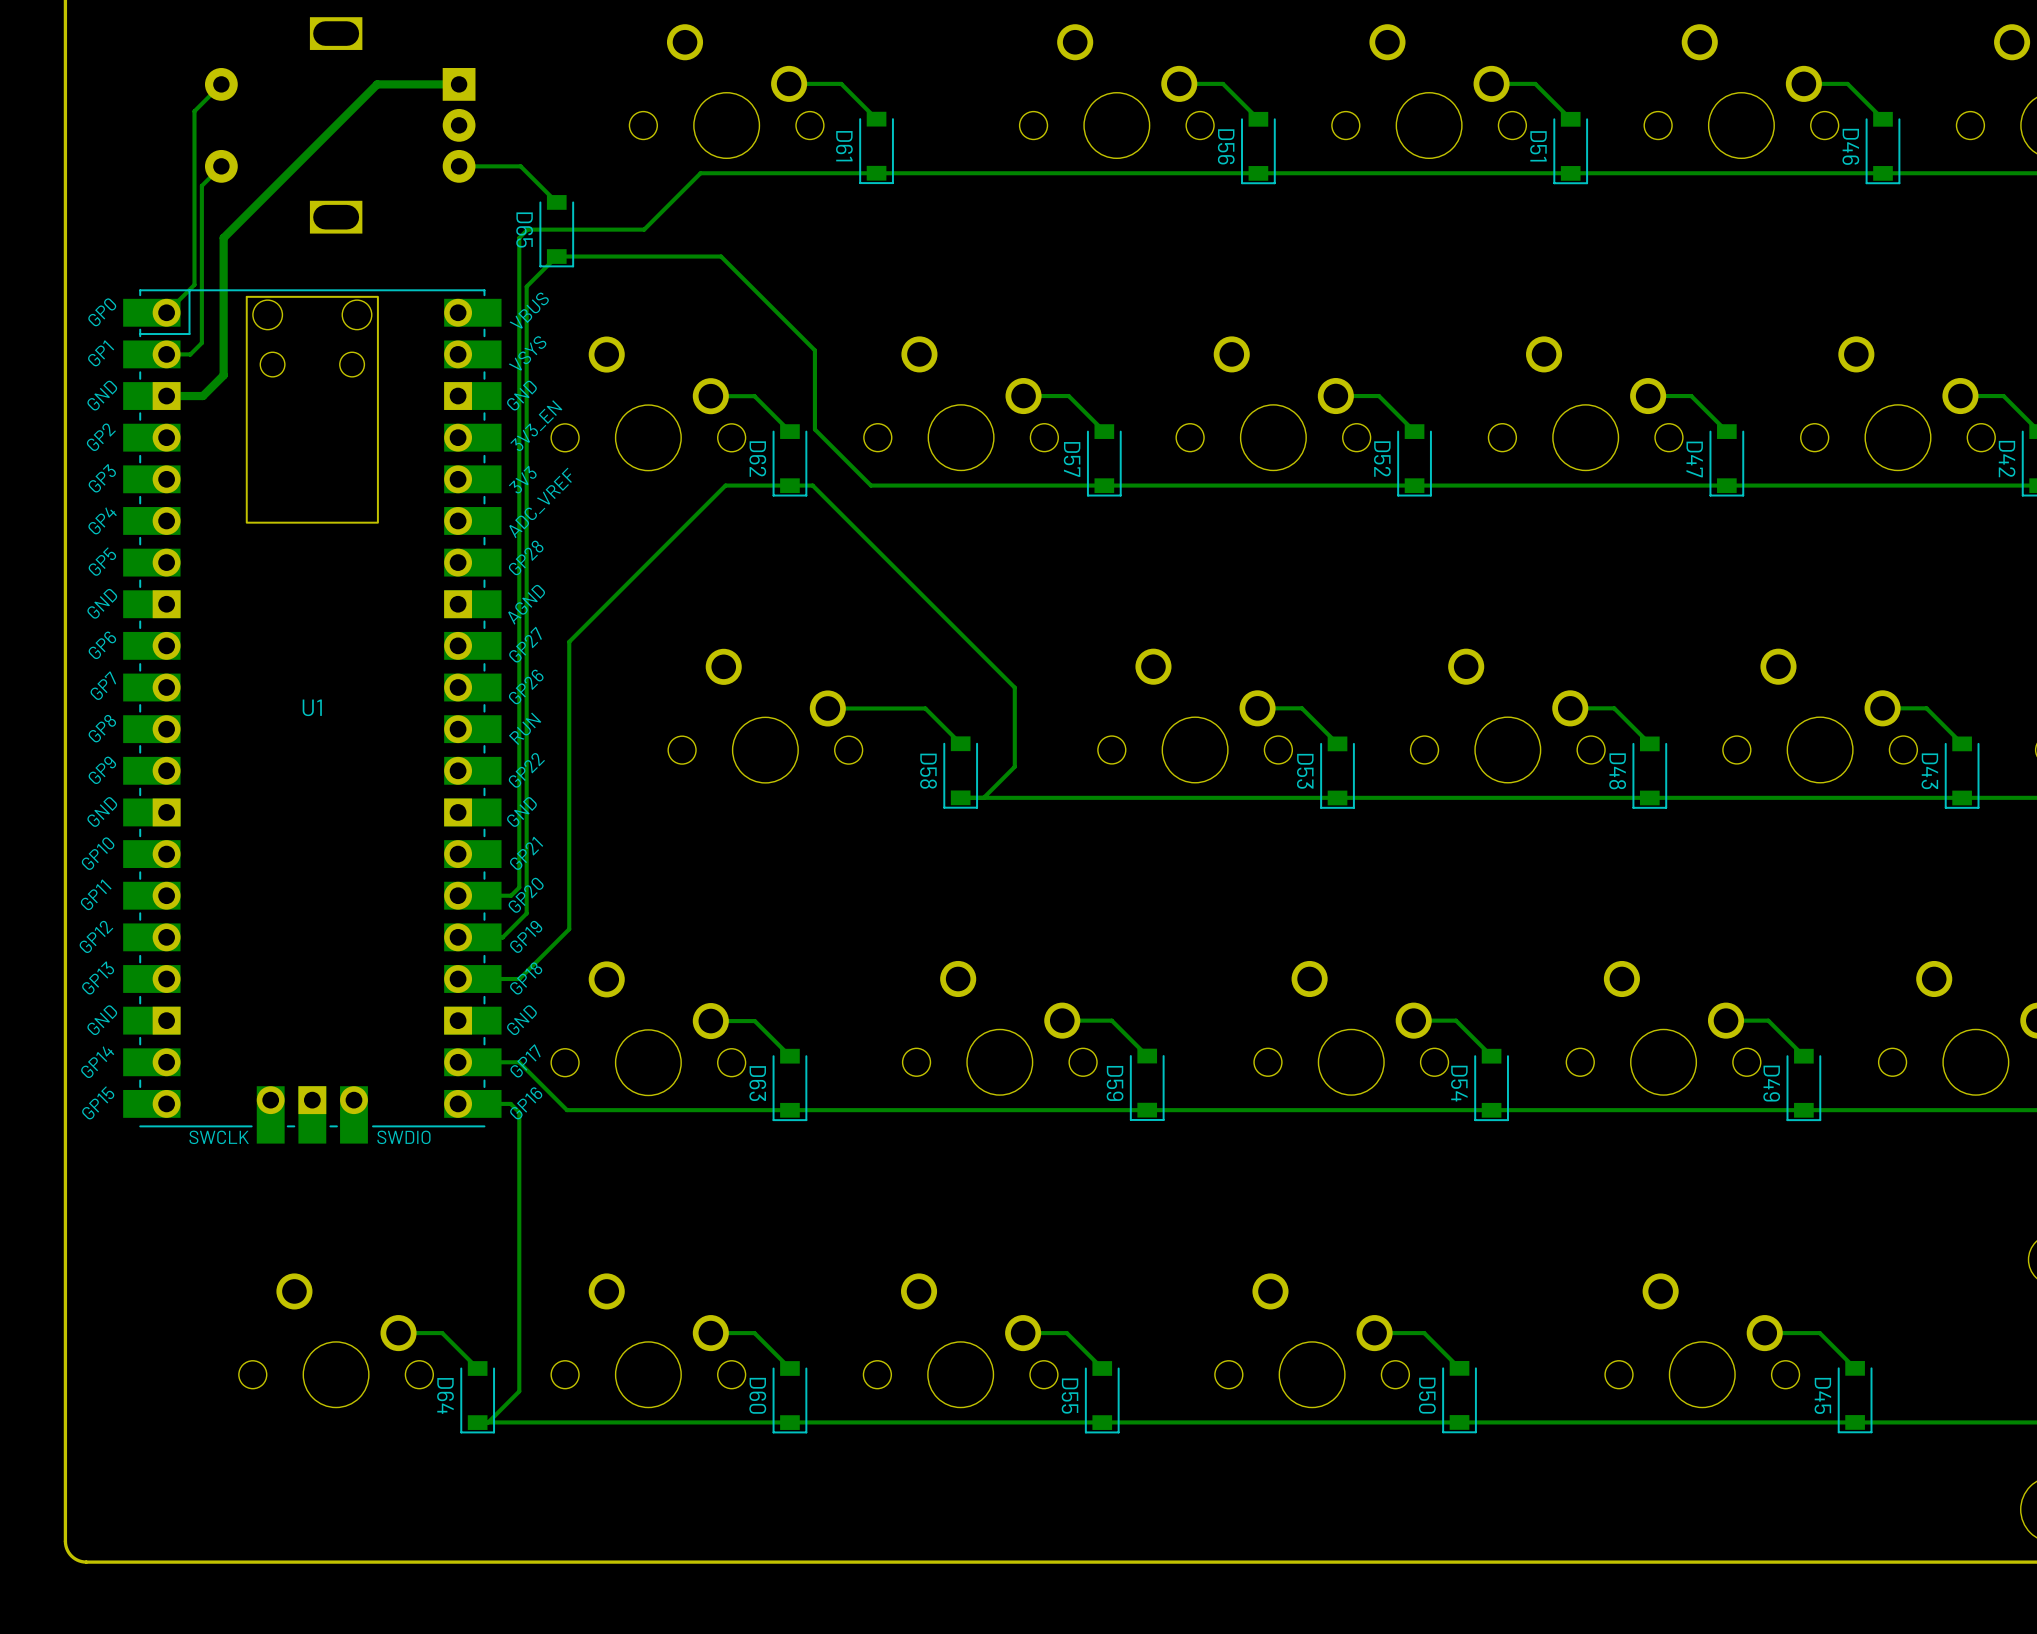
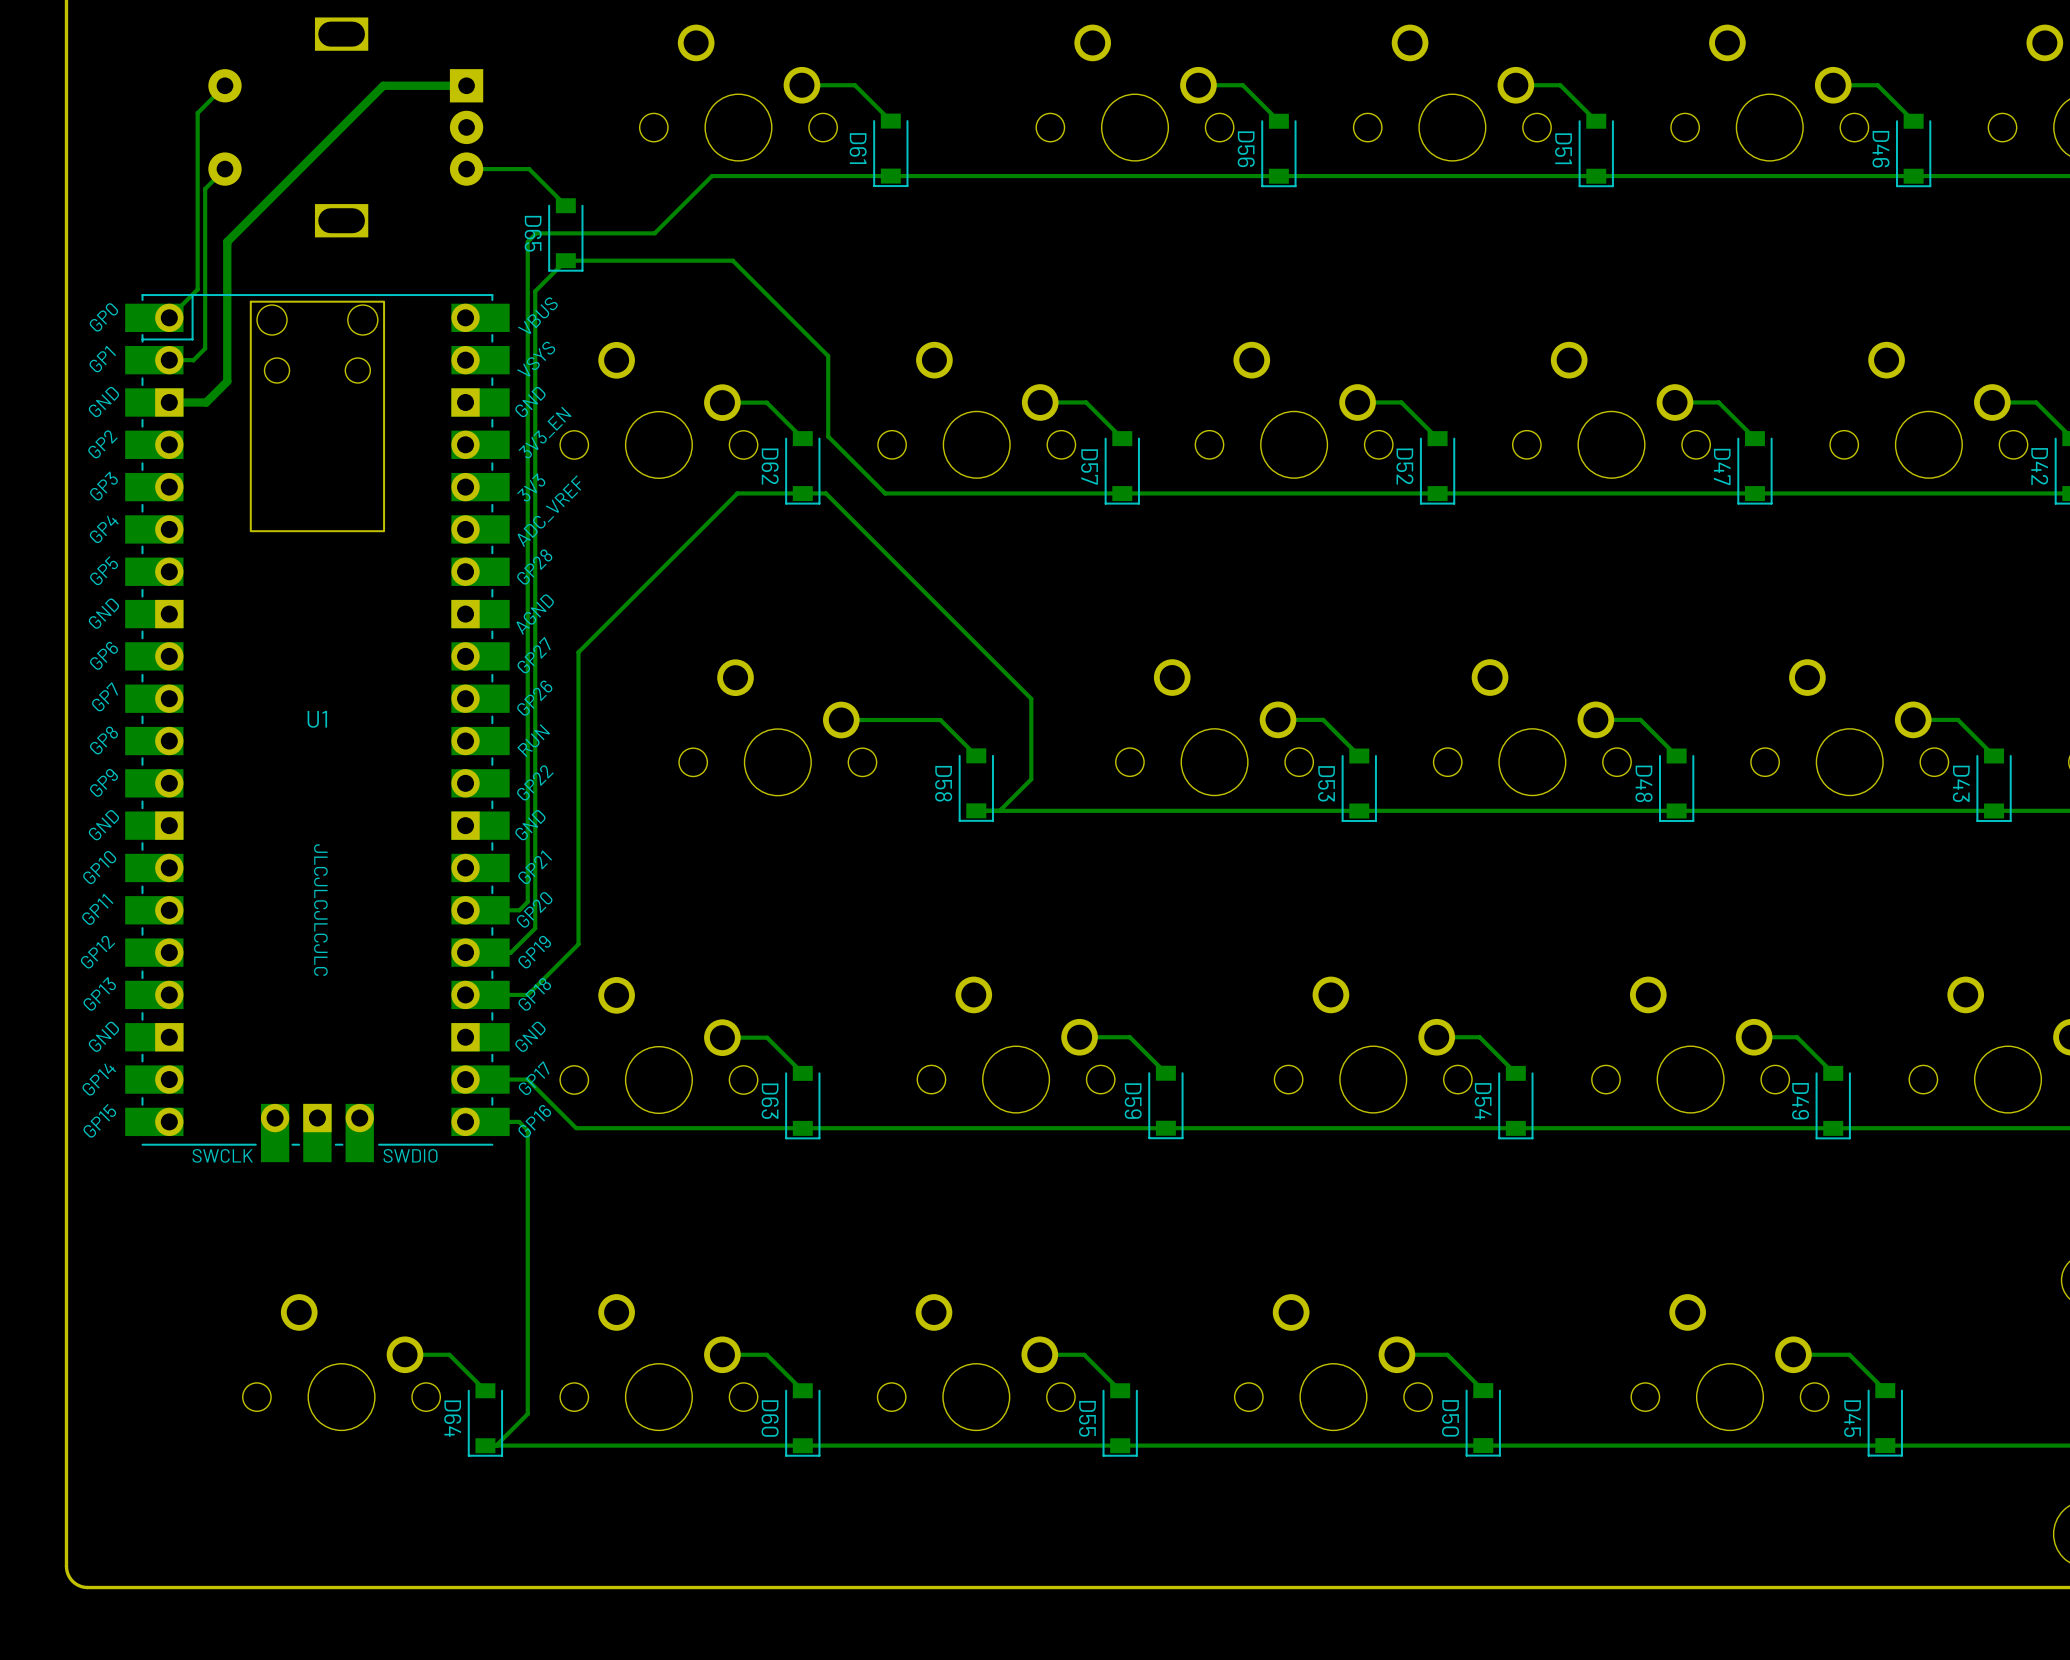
text: none -> JLCJLCJLCJLC (320, 910)

